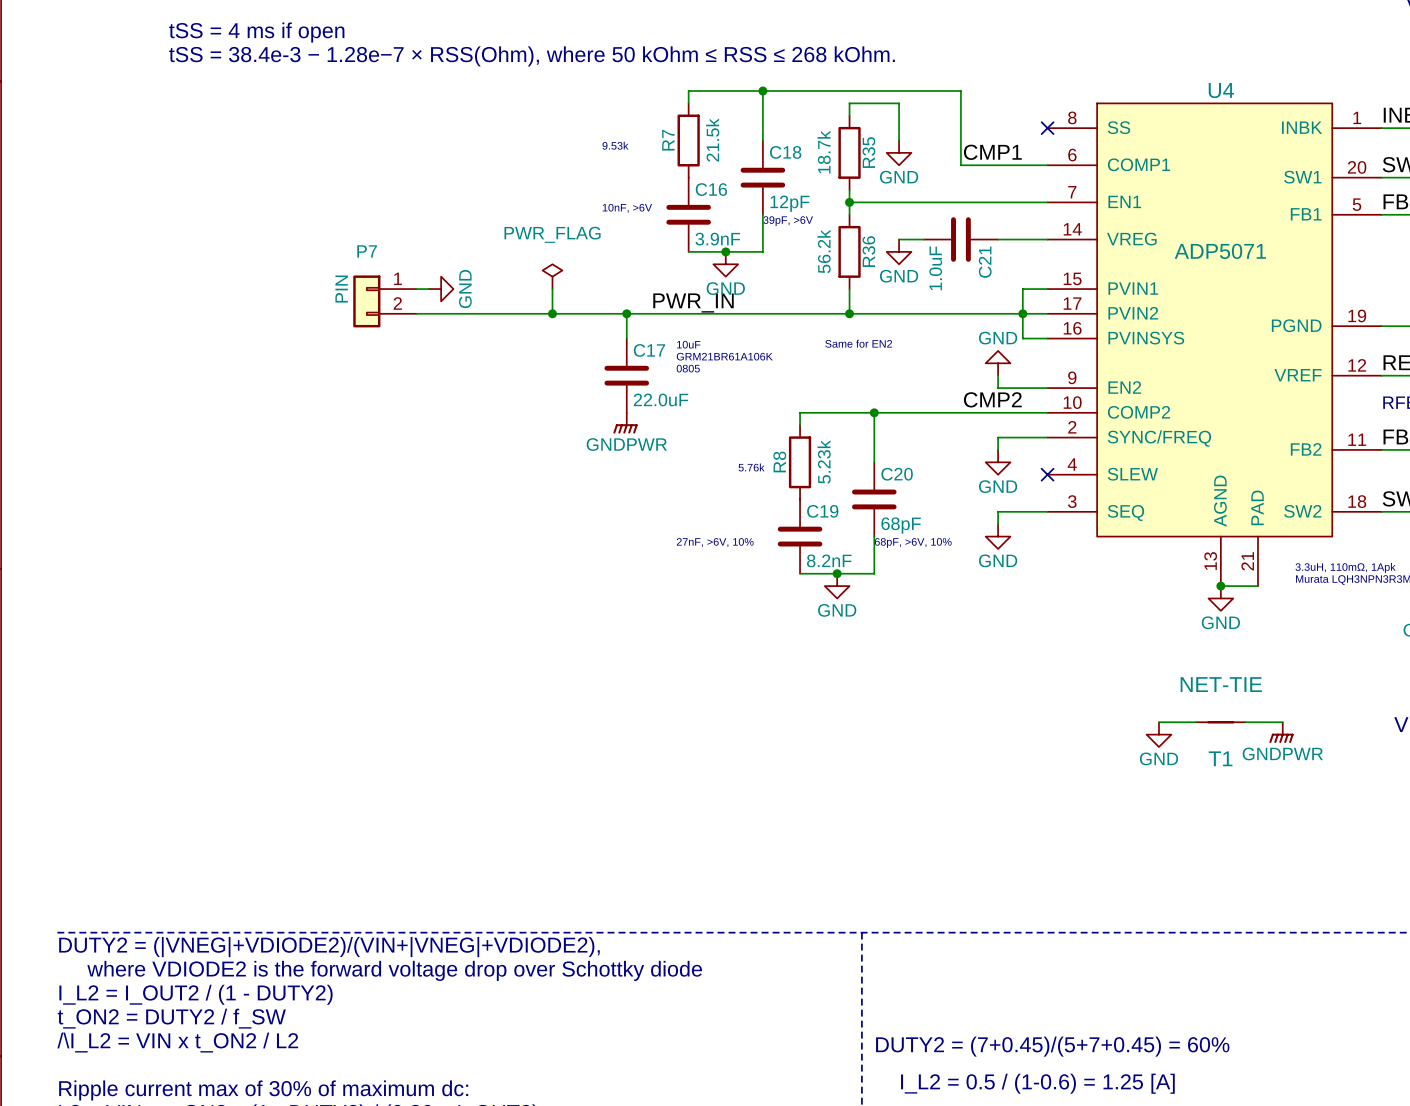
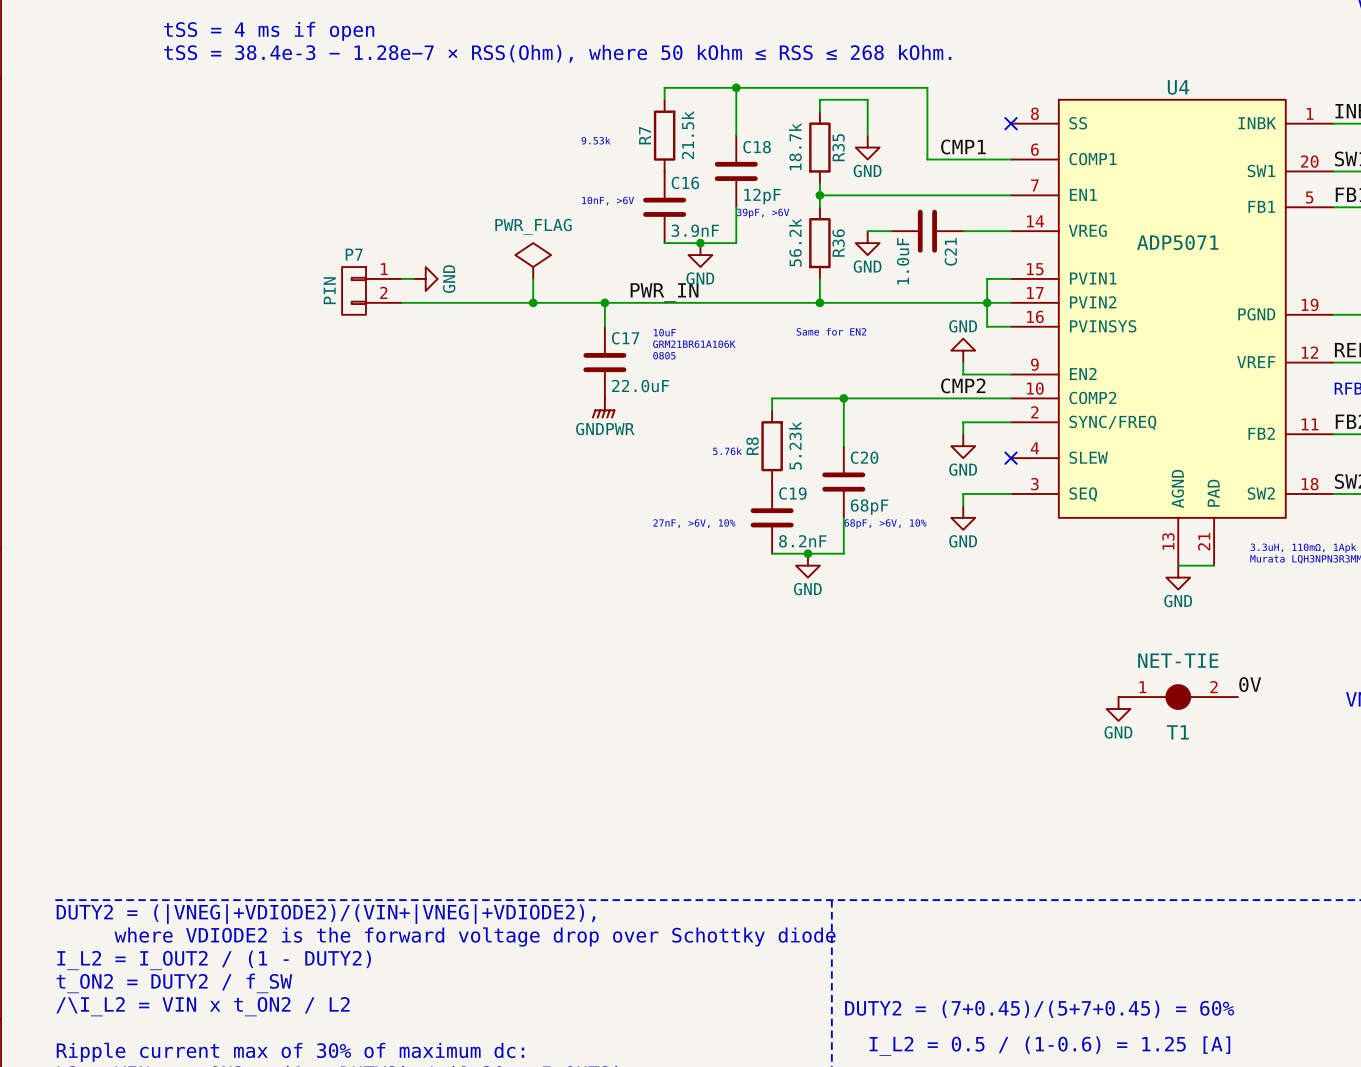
power symbol shape: [542, 264, 563, 290] -> [515, 243, 552, 279]
P7 symbol: [353, 275, 417, 328] -> [342, 267, 402, 315]
junction: (1220, 586) -> none
label: none -> 0V (1250, 684)
T1 symbol: [1196, 721, 1246, 724] -> [1118, 685, 1239, 709]
power symbol: GNDPWR (1281, 732) -> none

